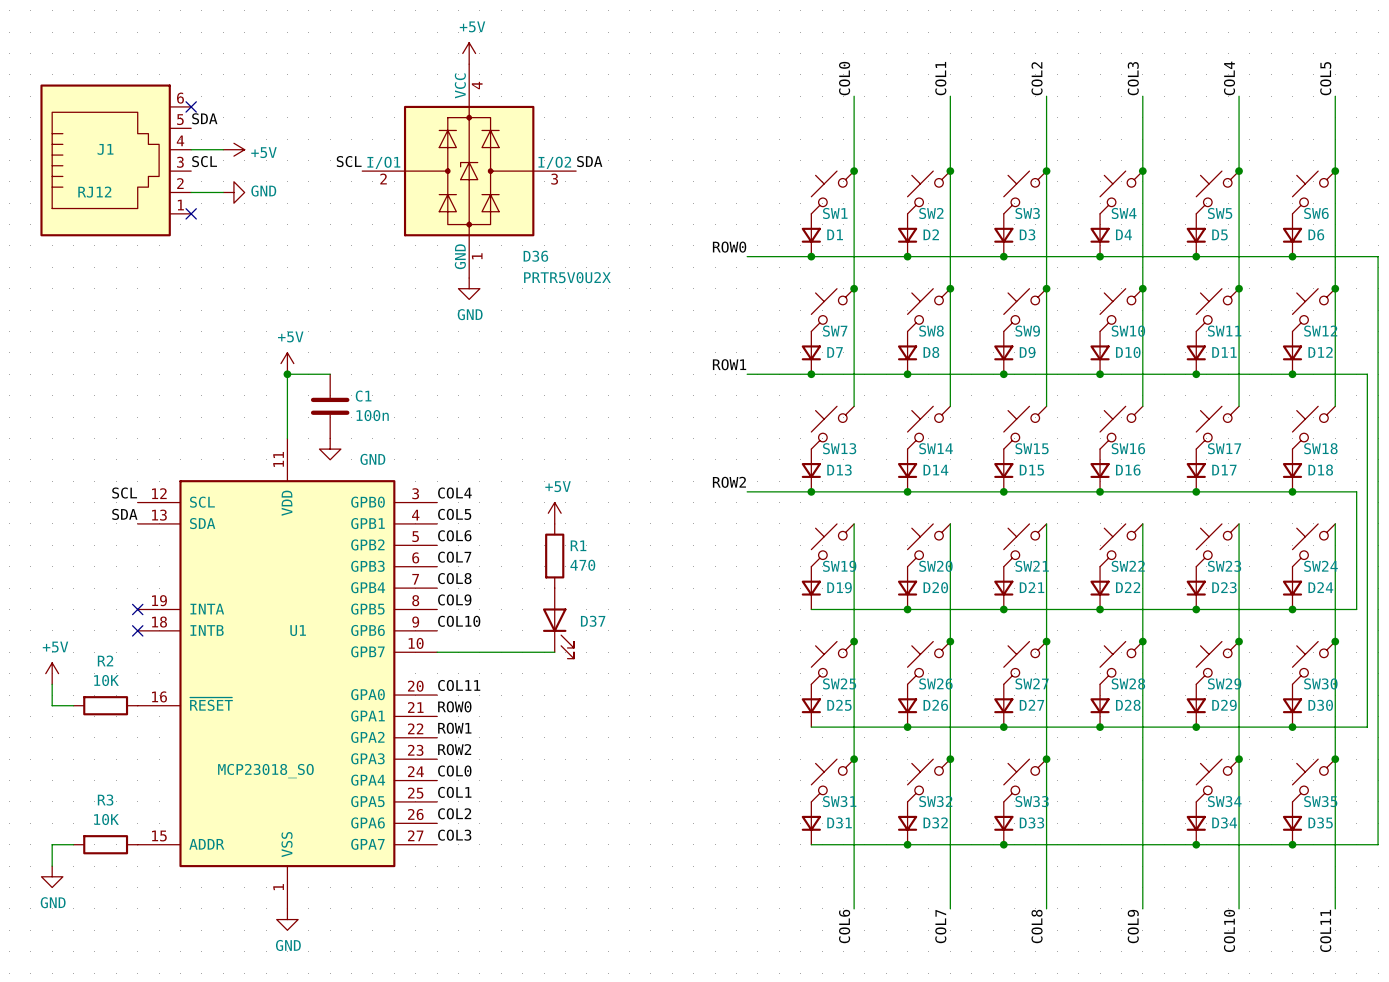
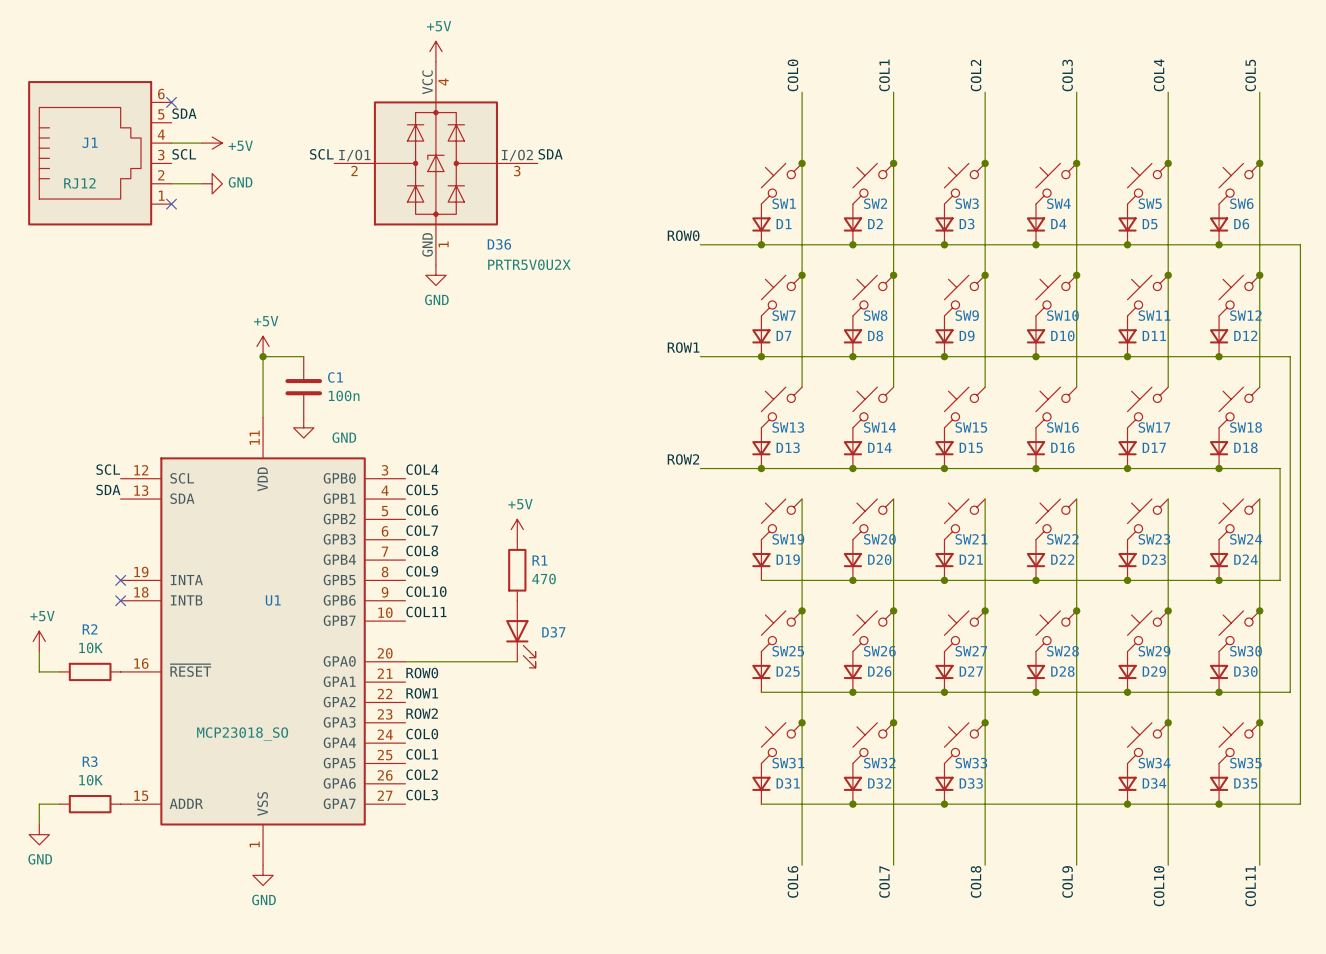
power symbol position: +5V (554, 513) -> +5V (517, 529)
R1 position: (554, 556) -> (517, 570)
D37 position: (558, 623) -> (520, 634)
wire: (437, 652) (554, 652) -> (405, 661) (517, 661)
label position: COL11 (459, 685) -> COL11 (426, 612)

